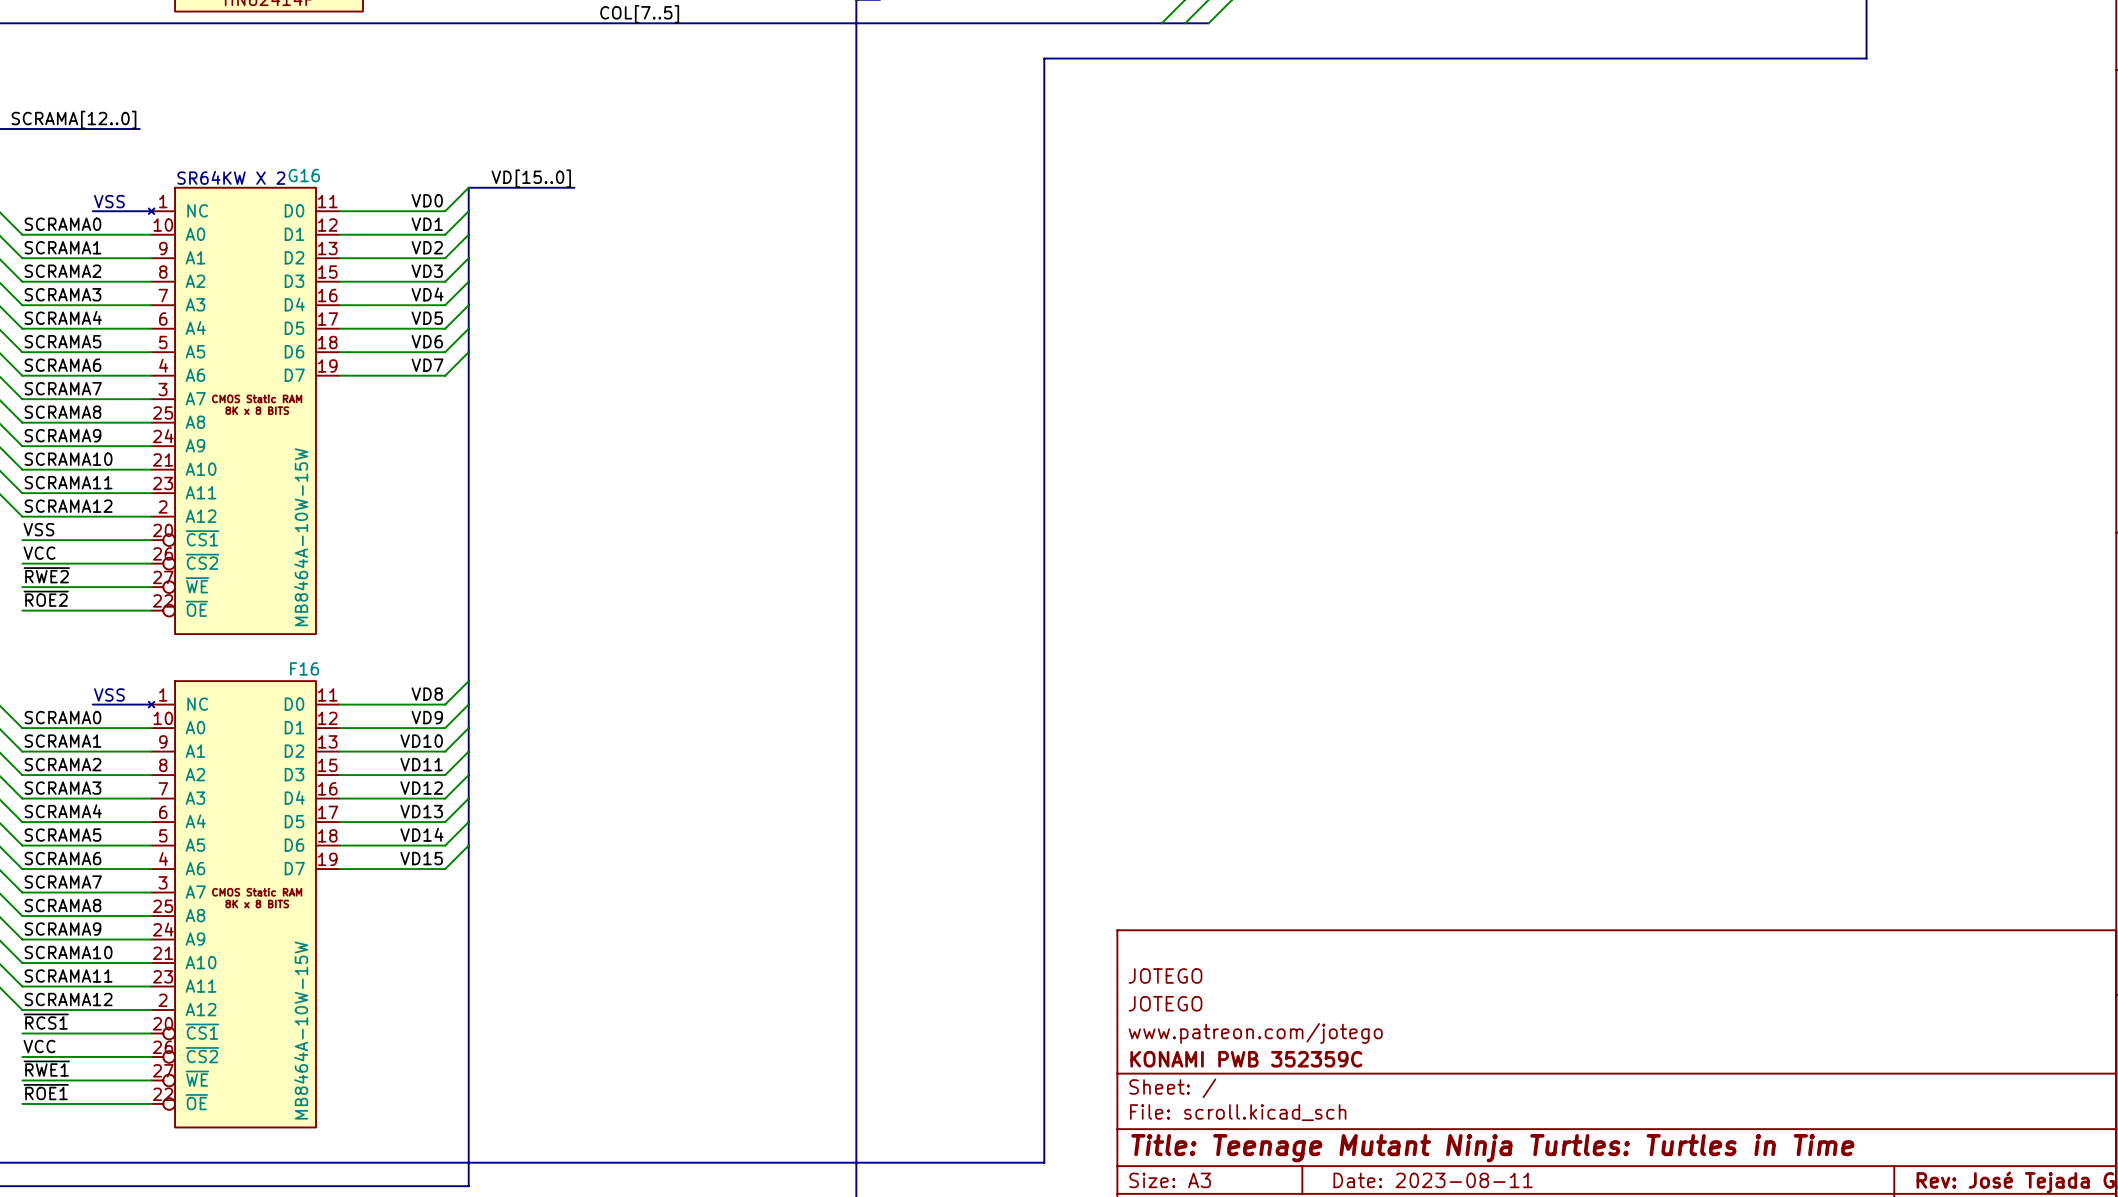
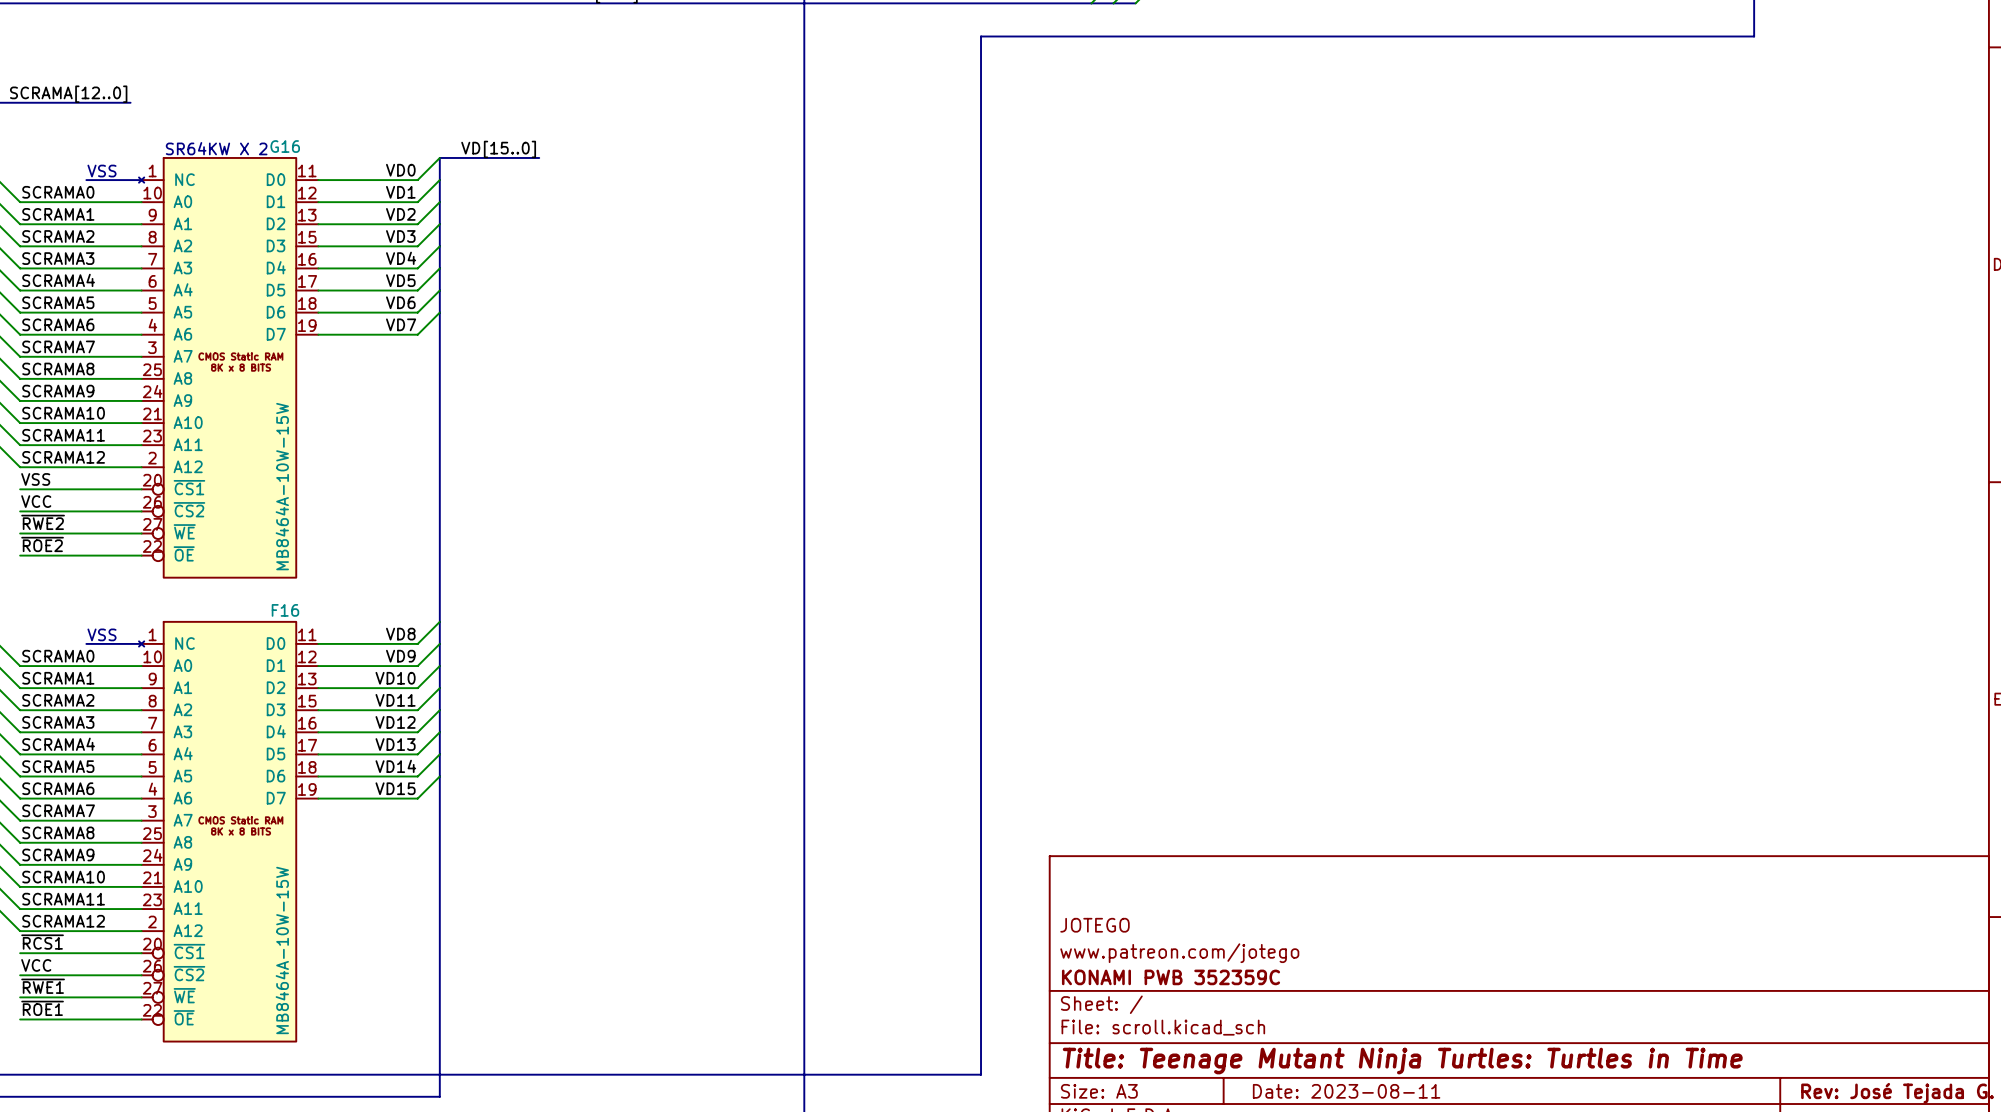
title block: JOTEGO (1165, 976) -> none

